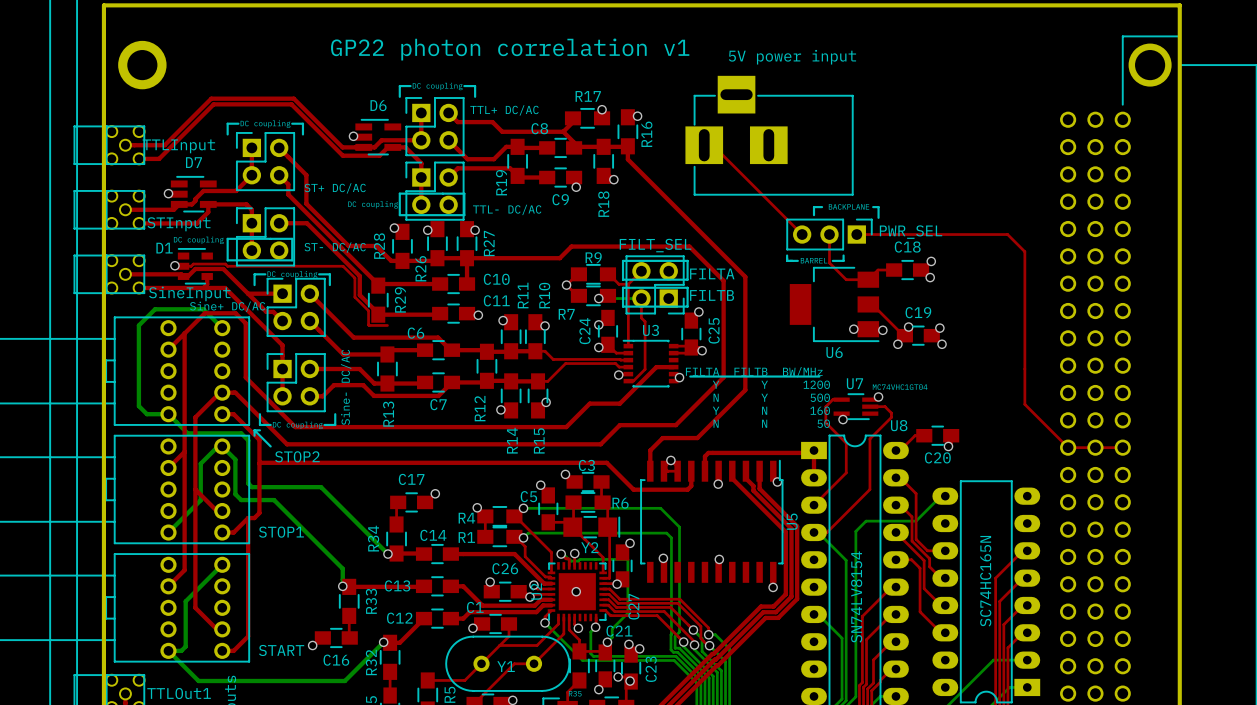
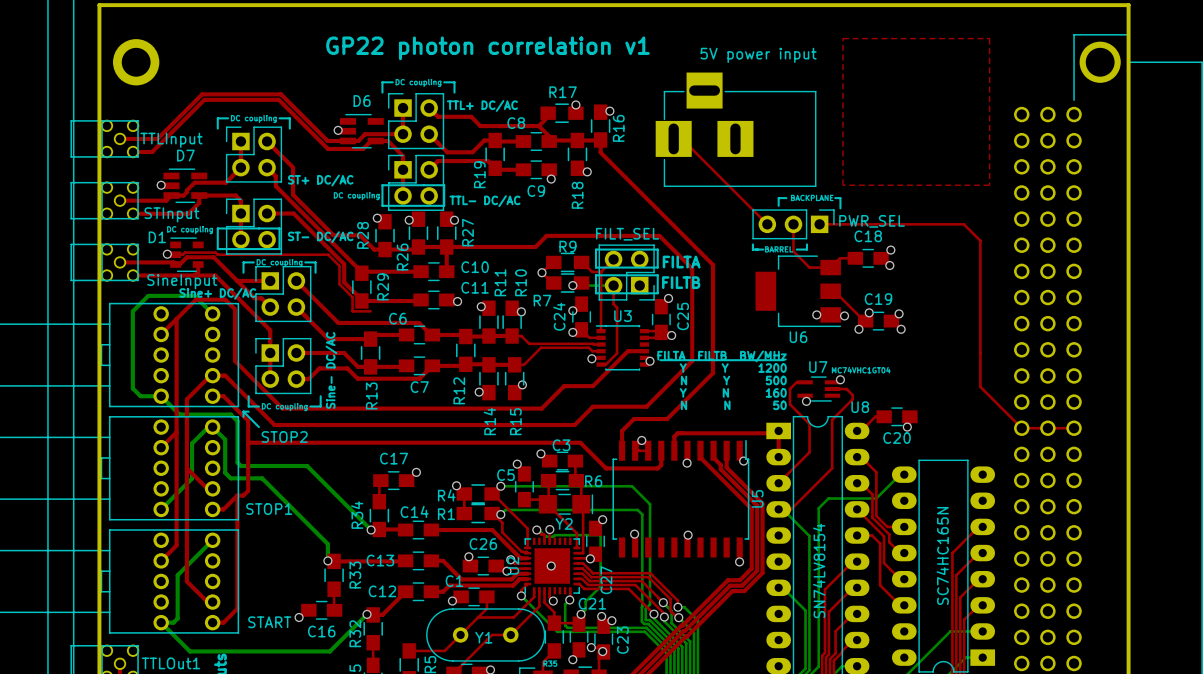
top zone outline: none -> (842, 38) (989, 38) (989, 185) (842, 185) (842, 38)

